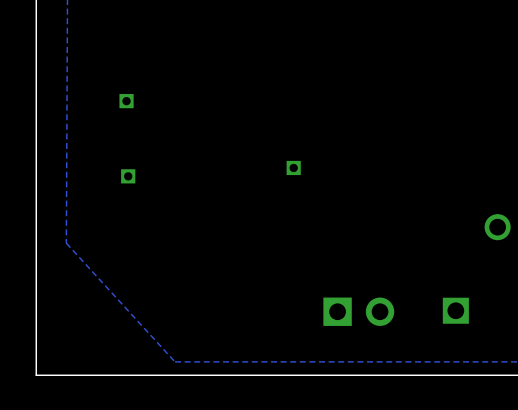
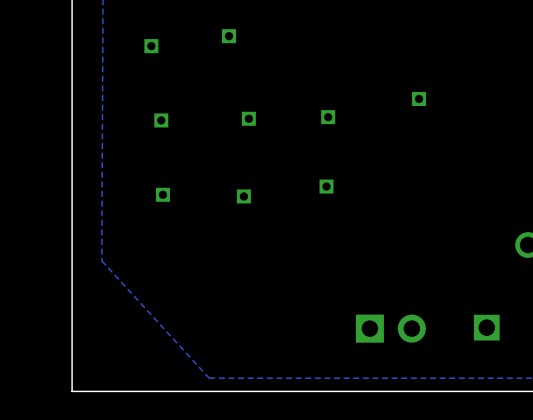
part: none -> (229, 36)
part: none -> (151, 46)
part: none -> (419, 98)
part: none -> (328, 117)
part: none -> (248, 118)
part: none -> (243, 196)

